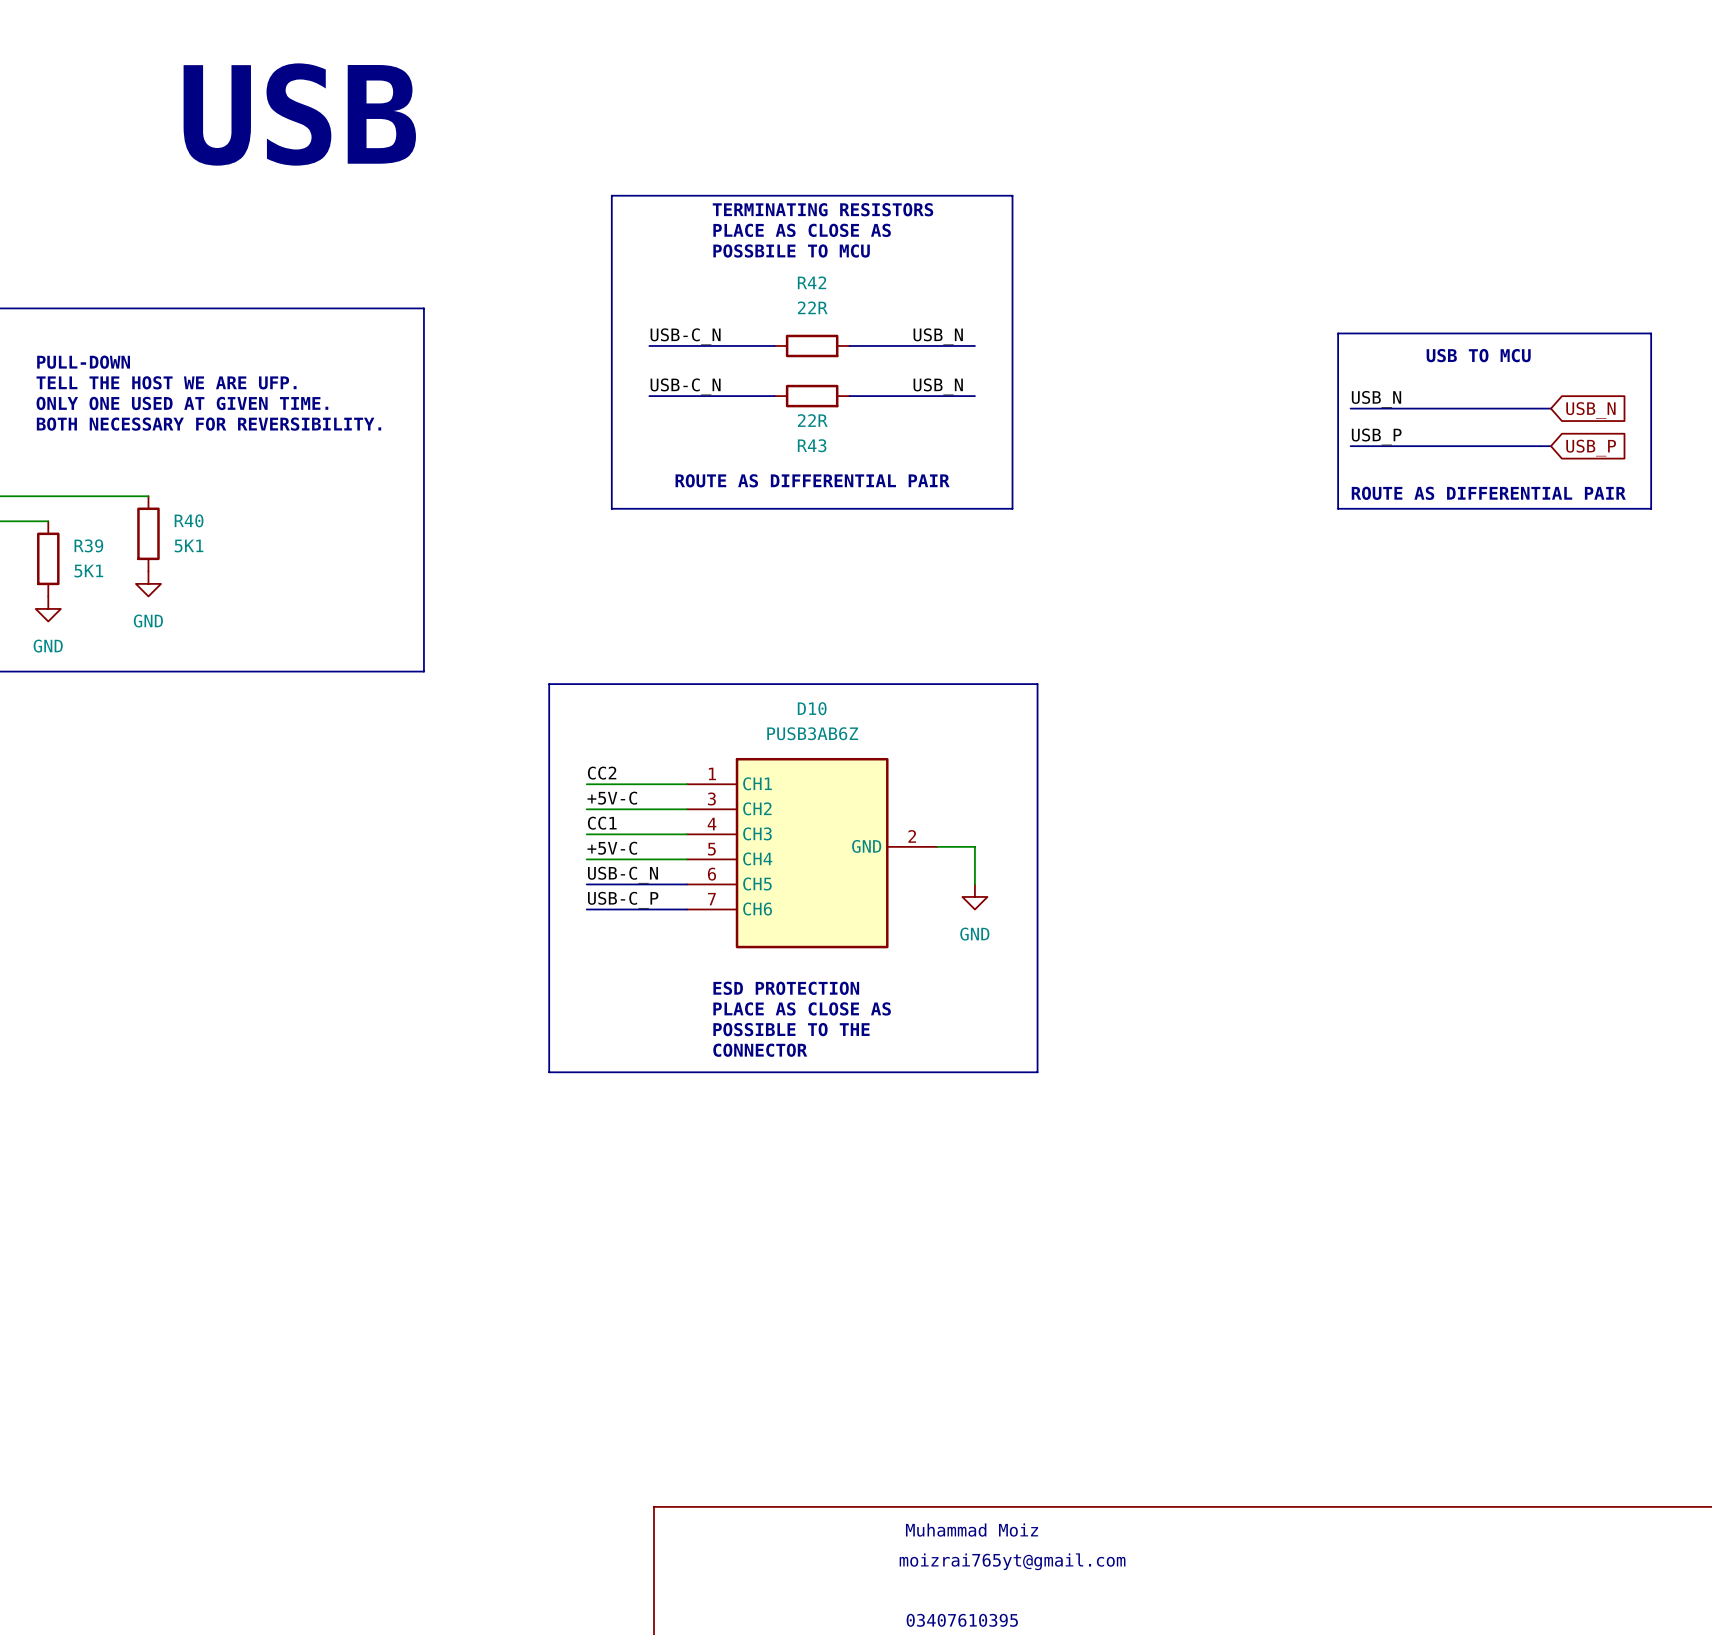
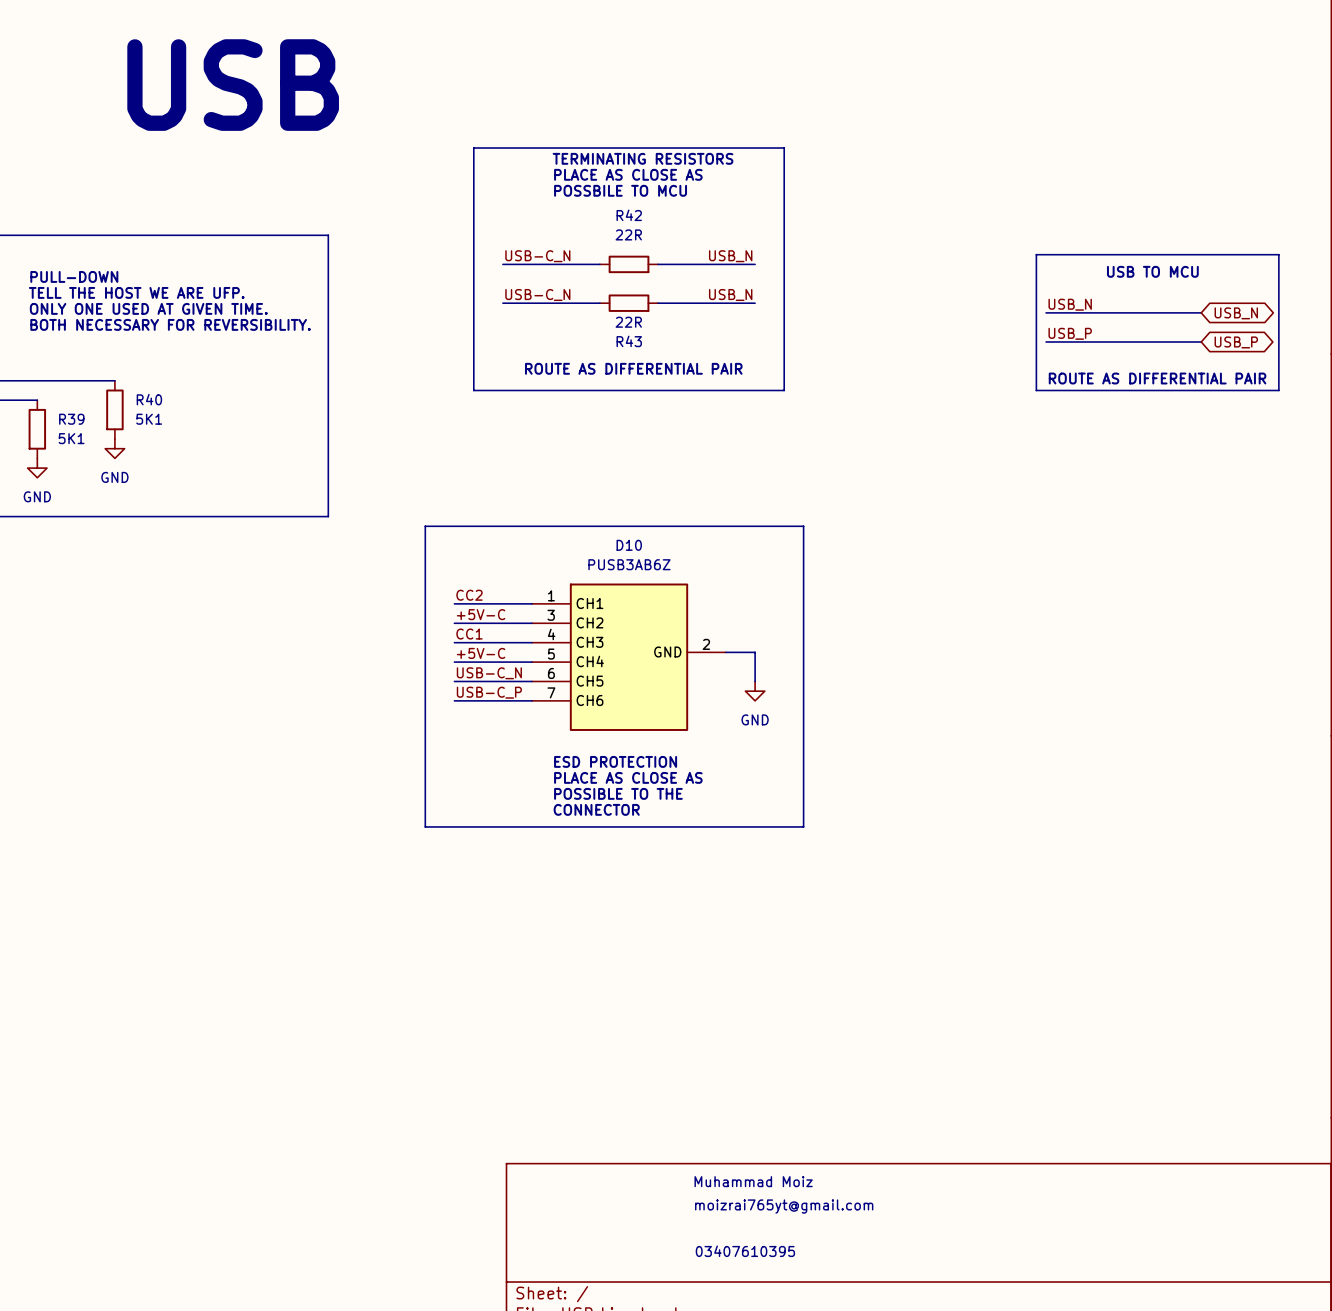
global label shape: input (1590, 410) -> bidirectional (1236, 313)
global label shape: input (1591, 448) -> bidirectional (1236, 342)

